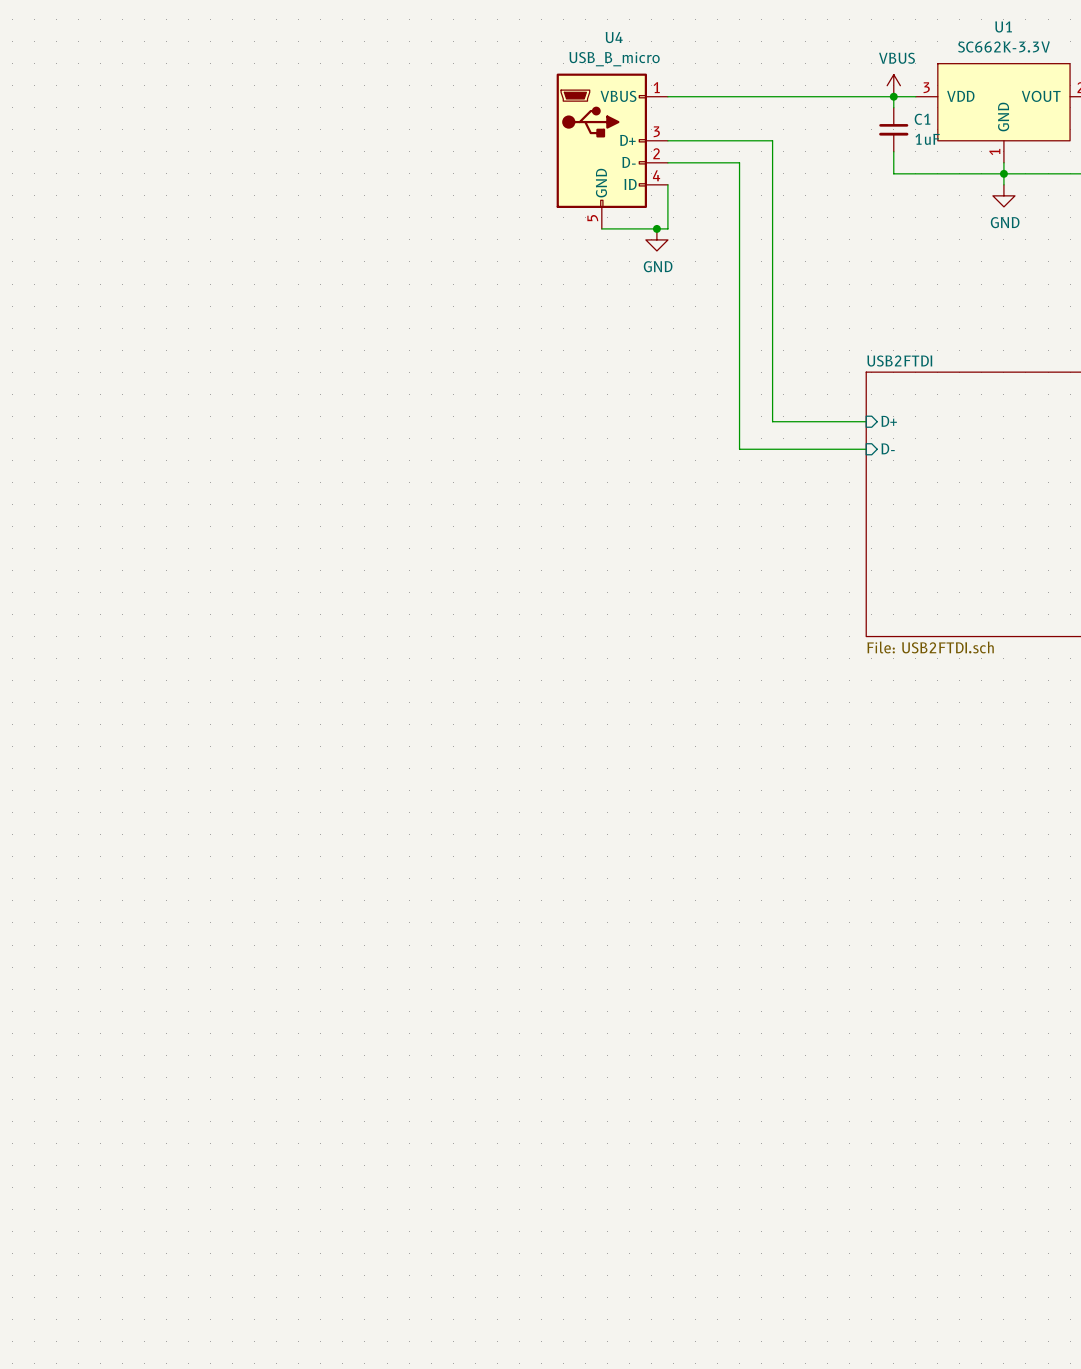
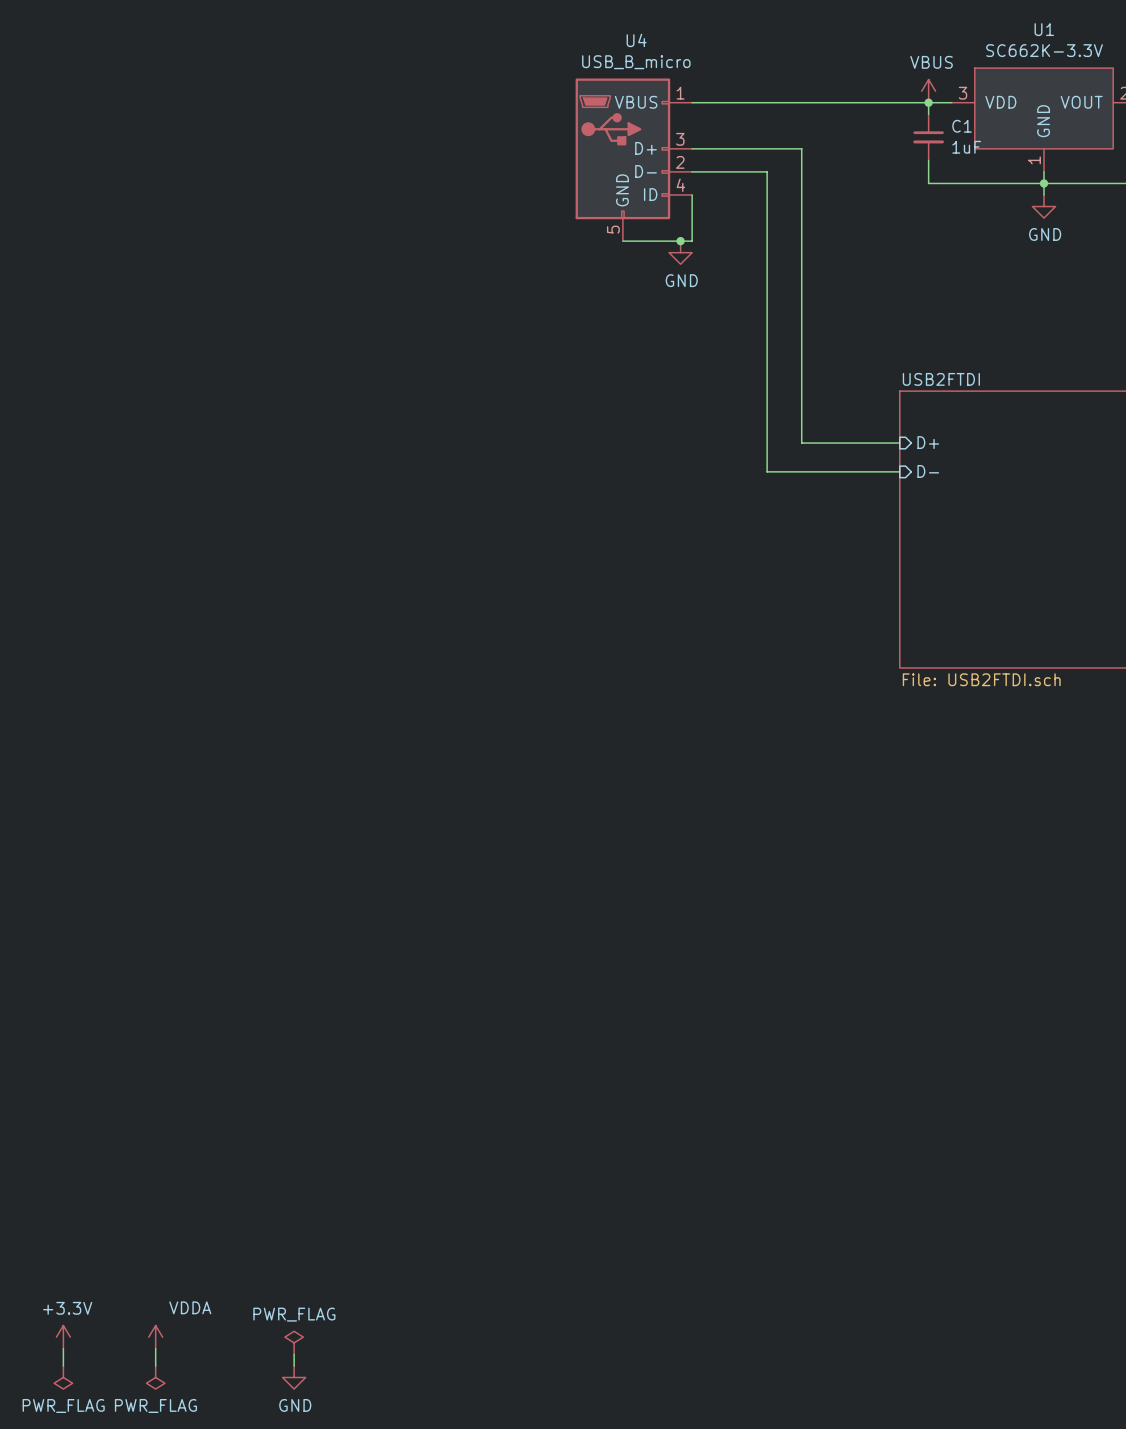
power symbol: none -> +3.3V (63, 1337)
power symbol: none -> VDDA (155, 1337)
power symbol: none -> PWR_FLAG (294, 1342)
wire: none -> (63, 1348) (63, 1365)
wire: none -> (155, 1348) (155, 1365)
wire: none -> (294, 1354) (294, 1365)
power symbol: none -> PWR_FLAG (63, 1377)
power symbol: none -> PWR_FLAG (155, 1377)
power symbol: none -> GND (294, 1377)

